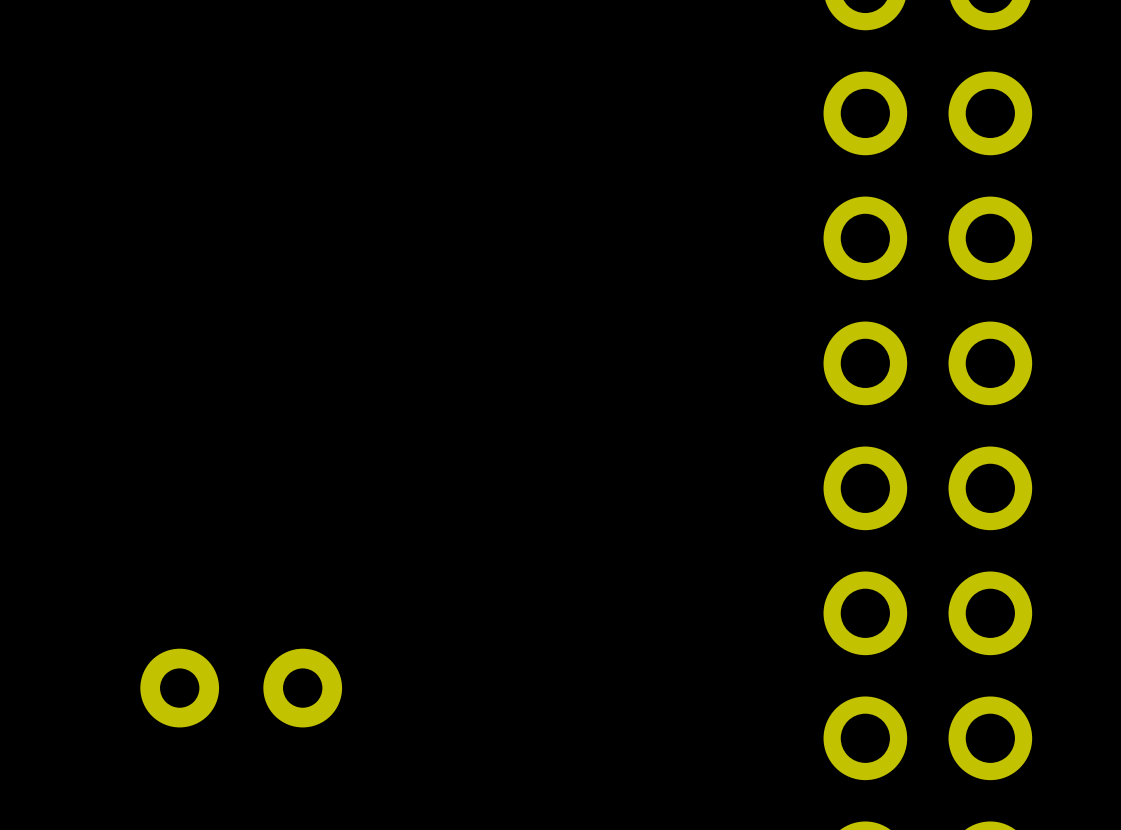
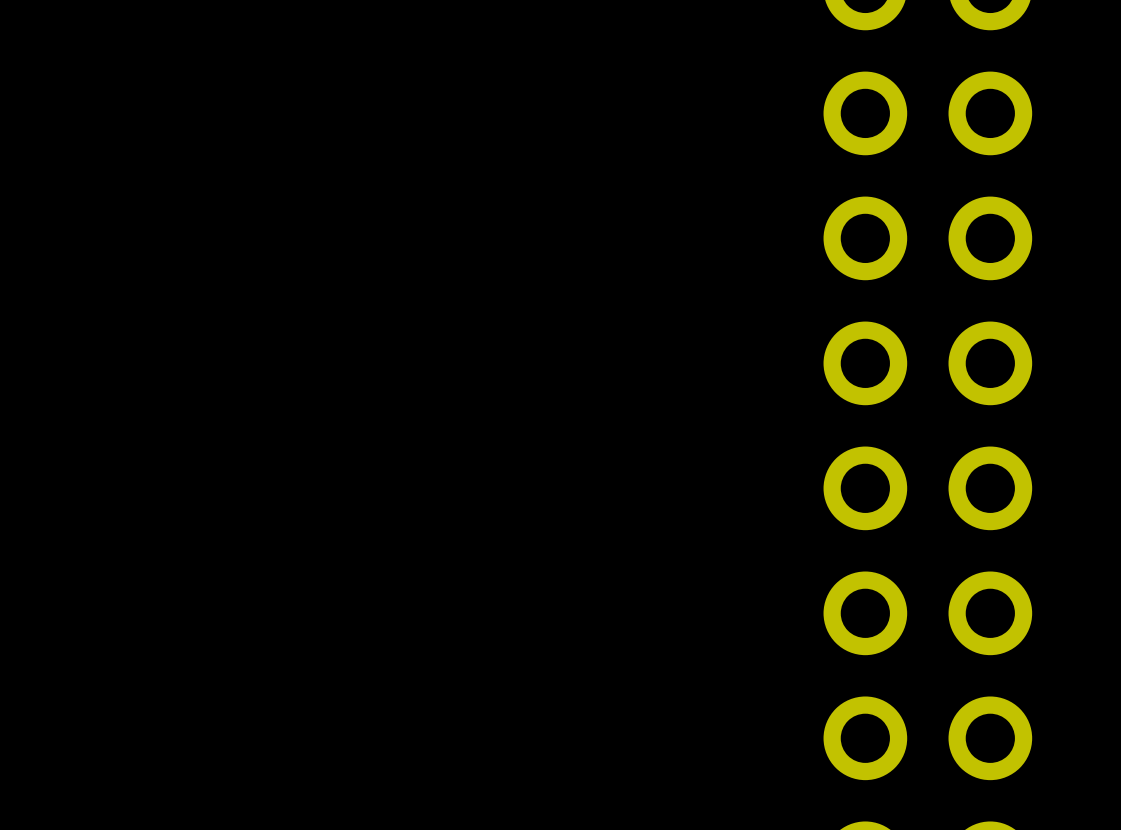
part: (241, 688) -> none

